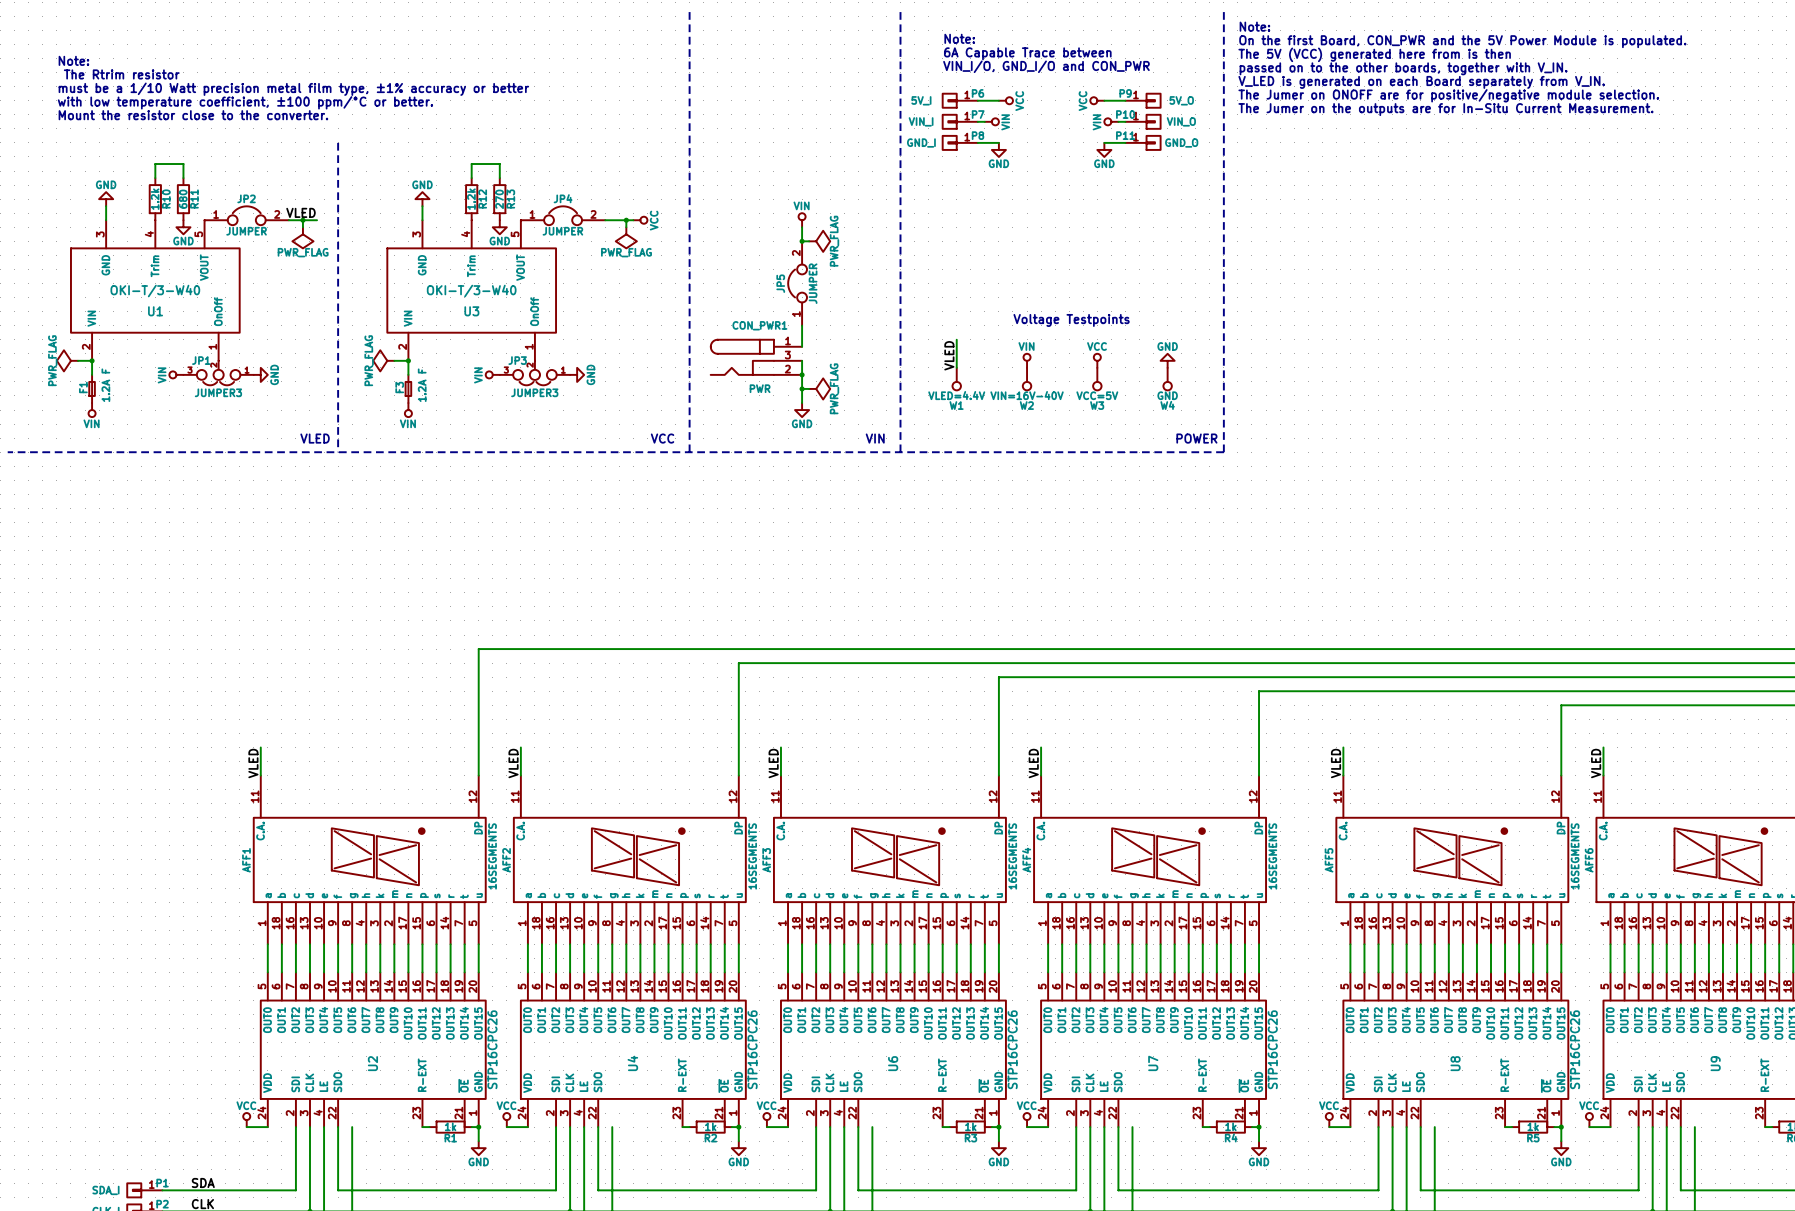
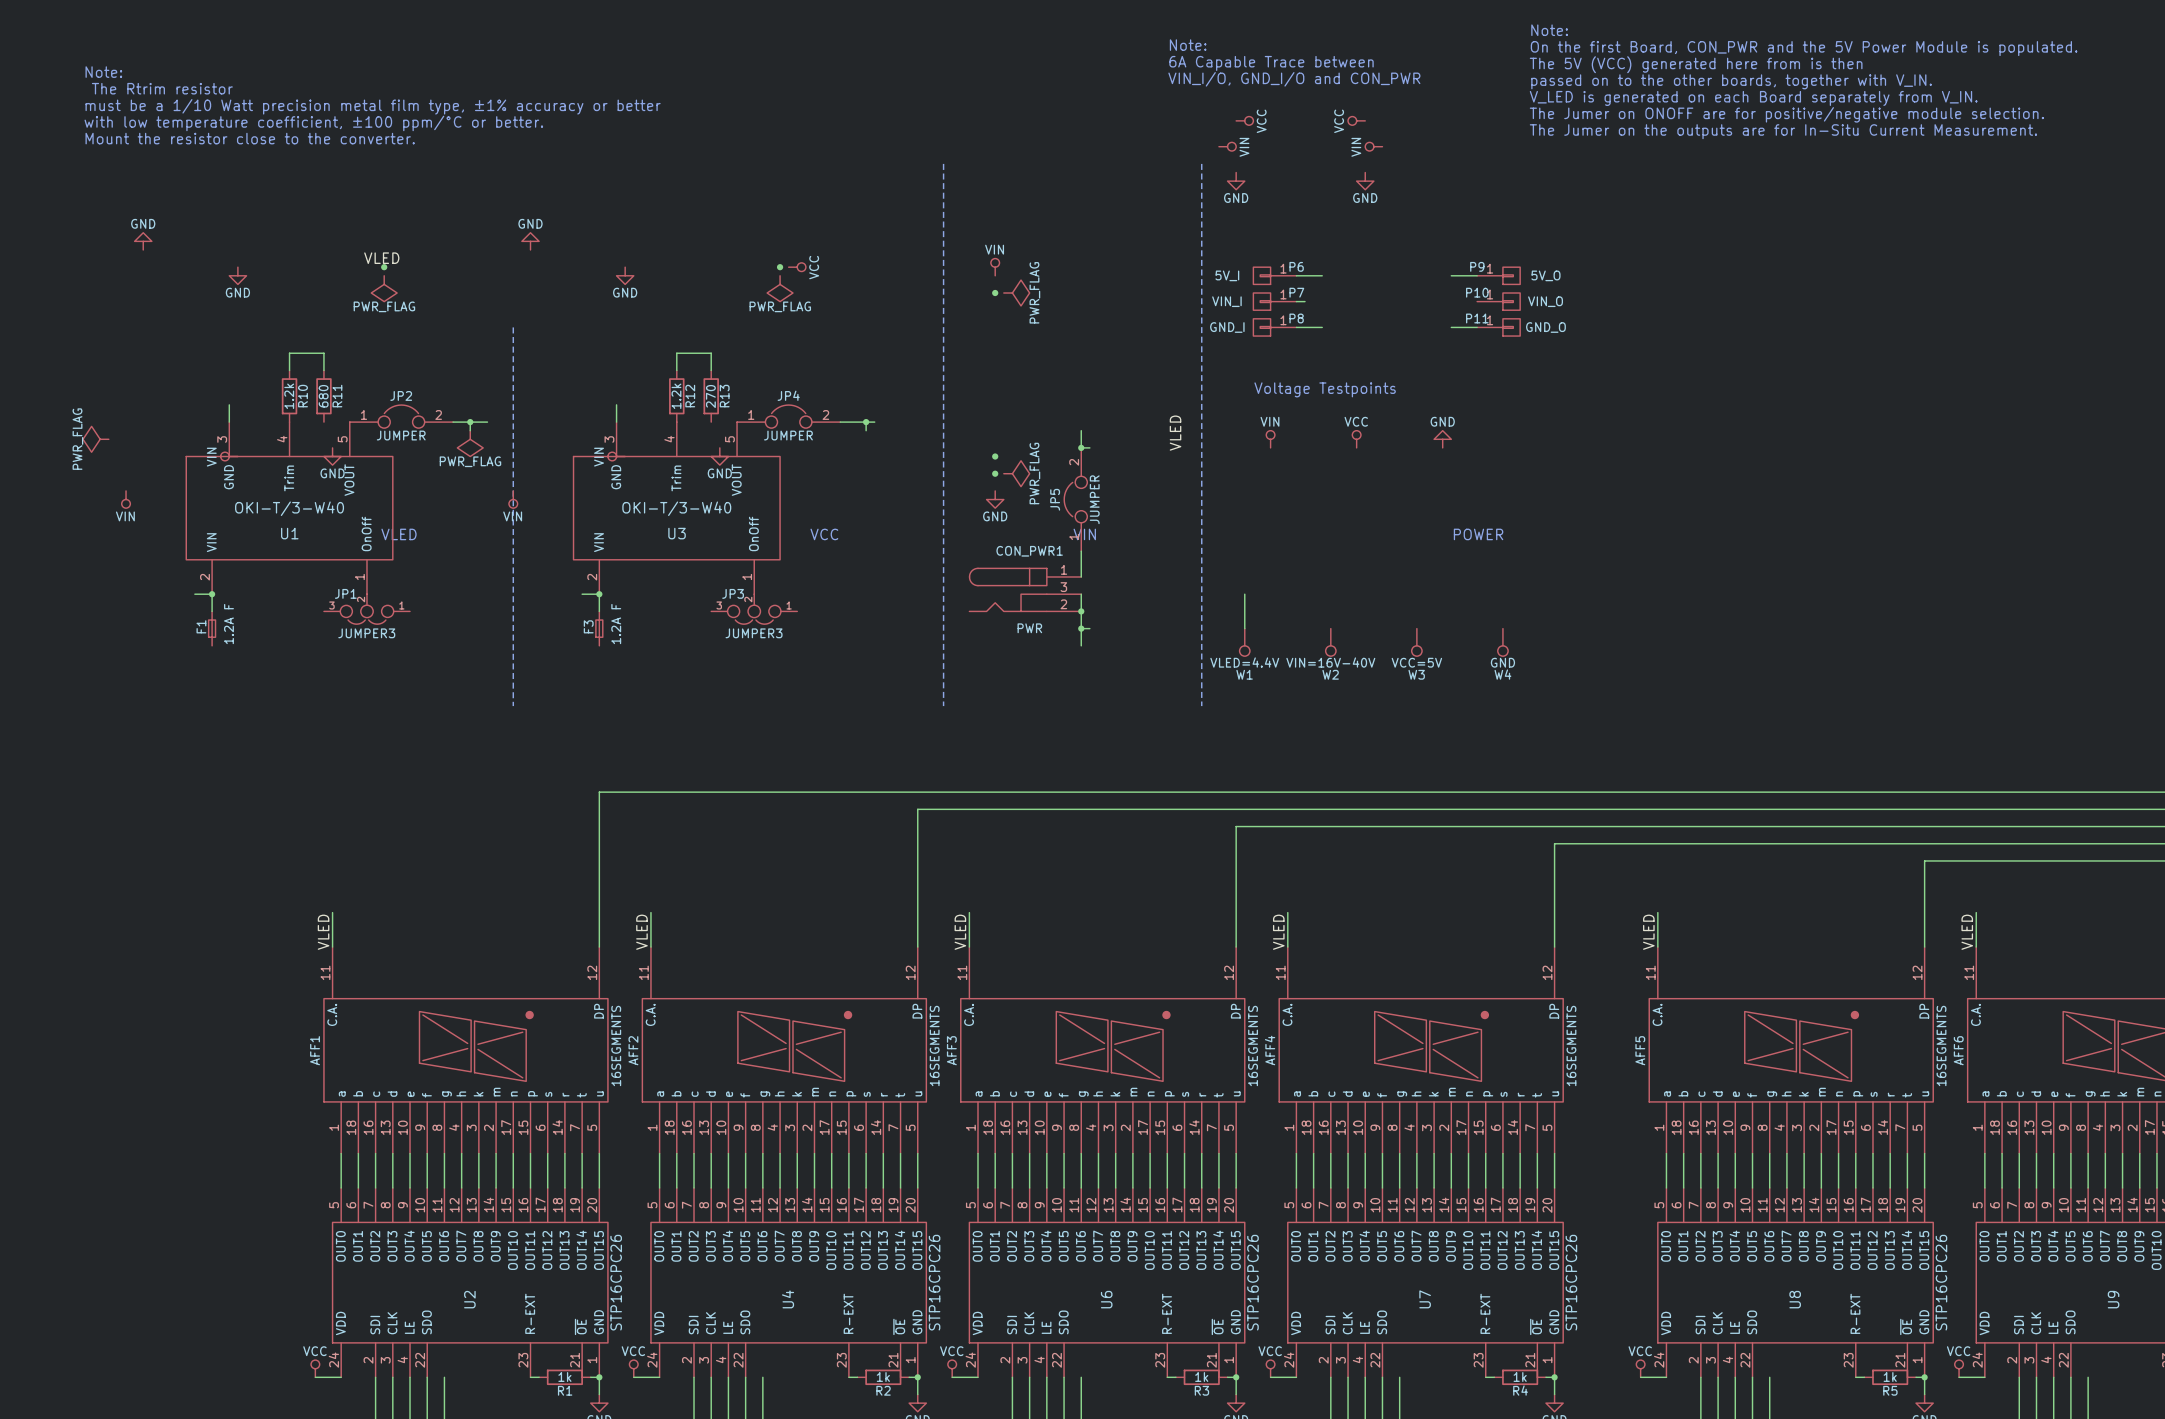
line: (689, 9) (689, 452) -> none
line: (900, 9) (900, 452) -> none
line: (1223, 9) (1223, 452) (7, 452) -> none
P6 position: (960, 100) -> (1274, 275)
wire: (977, 100) (998, 100) -> none
wire: (1104, 100) (1125, 100) -> none
P9 position: (1143, 100) -> (1498, 275)
P7 position: (960, 121) -> (1274, 301)
wire: (977, 121) (984, 121) -> none
wire: (1118, 121) (1125, 121) -> none
P10 position: (1143, 121) -> (1498, 301)
line: none -> (943, 163) (943, 706)
line: none -> (1201, 163) (1201, 706)
line: (338, 142) (338, 452) -> none
P8 position: (960, 142) -> (1274, 327)
wire: (977, 142) (998, 142) -> (1296, 275) (1322, 275)
wire: (1104, 142) (1125, 142) -> (1451, 275) (1477, 275)
P11 position: (1143, 142) -> (1498, 327)
wire: (155, 178) (155, 164) (183, 164) (183, 178) -> none
wire: (471, 178) (471, 164) (499, 164) (499, 178) -> none
R10 position: (155, 199) -> (289, 396)
R11 position: (183, 199) -> (323, 396)
R12 position: (471, 199) -> (676, 396)
R13 position: (499, 199) -> (711, 396)
wire: (106, 206) (106, 220) -> none
wire: (422, 206) (422, 220) -> none
JP2 position: (246, 215) -> (401, 416)
JP4 position: (563, 215) -> (788, 416)
wire: (288, 220) (317, 220) -> none
wire: (302, 220) (302, 227) -> none
wire: (605, 220) (633, 220) -> none
wire: (626, 220) (626, 227) -> none
wire: (802, 227) (802, 241) (809, 241) -> none
wire: none -> (1296, 301) (1305, 301)
line: none -> (513, 327) (513, 706)
wire: none -> (1296, 327) (1322, 327)
wire: none -> (1451, 327) (1477, 327)
JP5 position: (797, 283) -> (1075, 499)
U1 position: (155, 290) -> (289, 508)
U3 position: (471, 290) -> (676, 508)
wire: none -> (289, 370) (289, 353) (323, 353) (323, 370)
wire: none -> (676, 370) (676, 353) (711, 353) (711, 370)
wire: (802, 325) (802, 346) -> none
wire: none -> (229, 404) (229, 422)
wire: none -> (616, 404) (616, 422)
wire: (956, 339) (956, 367) -> none
wire: none -> (453, 422) (487, 422)
wire: none -> (470, 422) (470, 430)
junction: none -> (470, 422)
wire: none -> (840, 422) (874, 422)
wire: none -> (866, 422) (866, 430)
junction: none -> (866, 422)
wire: none -> (1081, 430) (1081, 447) (1089, 447)
CON_PWR1 position: (756, 357) -> (1025, 589)
wire: (78, 360) (92, 360) (92, 374) -> none
junction: (92, 360) -> none
power symbol rotation: 0° (383, 360) -> 90° counterclockwise (470, 443)
wire: (394, 360) (408, 360) (408, 374) -> none
junction: (408, 360) -> none
wire: (802, 360) (802, 403) -> none
junction: none -> (1081, 447)
JP1 position: (218, 373) -> (366, 609)
JP3 position: (534, 373) -> (754, 609)
power symbol rotation: 0° (260, 374) -> 90° clockwise (332, 456)
power symbol rotation: 0° (577, 374) -> 90° clockwise (719, 456)
W1 position: (956, 379) -> (1244, 642)
W2 position: (1027, 379) -> (1330, 642)
W3 position: (1097, 379) -> (1416, 642)
W4 position: (1167, 379) -> (1502, 642)
F1 position: (92, 388) -> (212, 628)
F3 position: (408, 388) -> (599, 628)
wire: (802, 388) (809, 388) -> none
wire: none -> (1081, 551) (1081, 576)
wire: none -> (194, 594) (212, 594) (212, 611)
junction: none -> (212, 594)
wire: none -> (582, 594) (599, 594) (599, 611)
junction: none -> (599, 594)
wire: none -> (1081, 594) (1081, 645)
wire: none -> (1244, 594) (1244, 628)
junction: none -> (1081, 611)
wire: none -> (1081, 628) (1089, 628)
junction: none -> (1081, 628)

